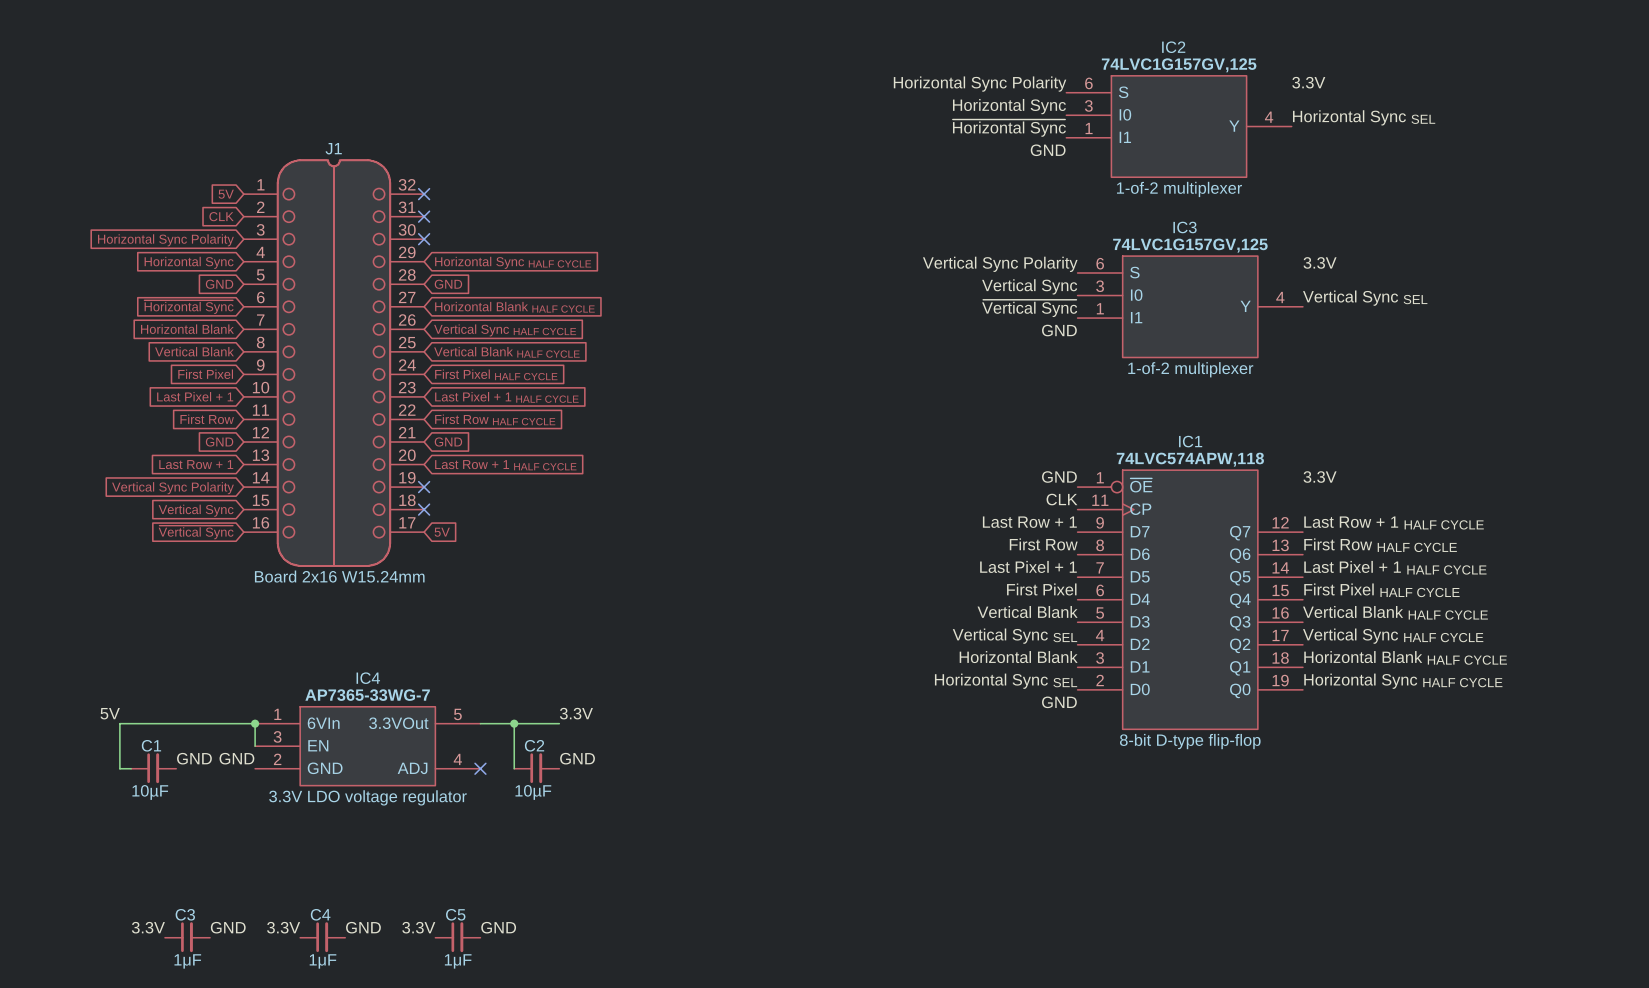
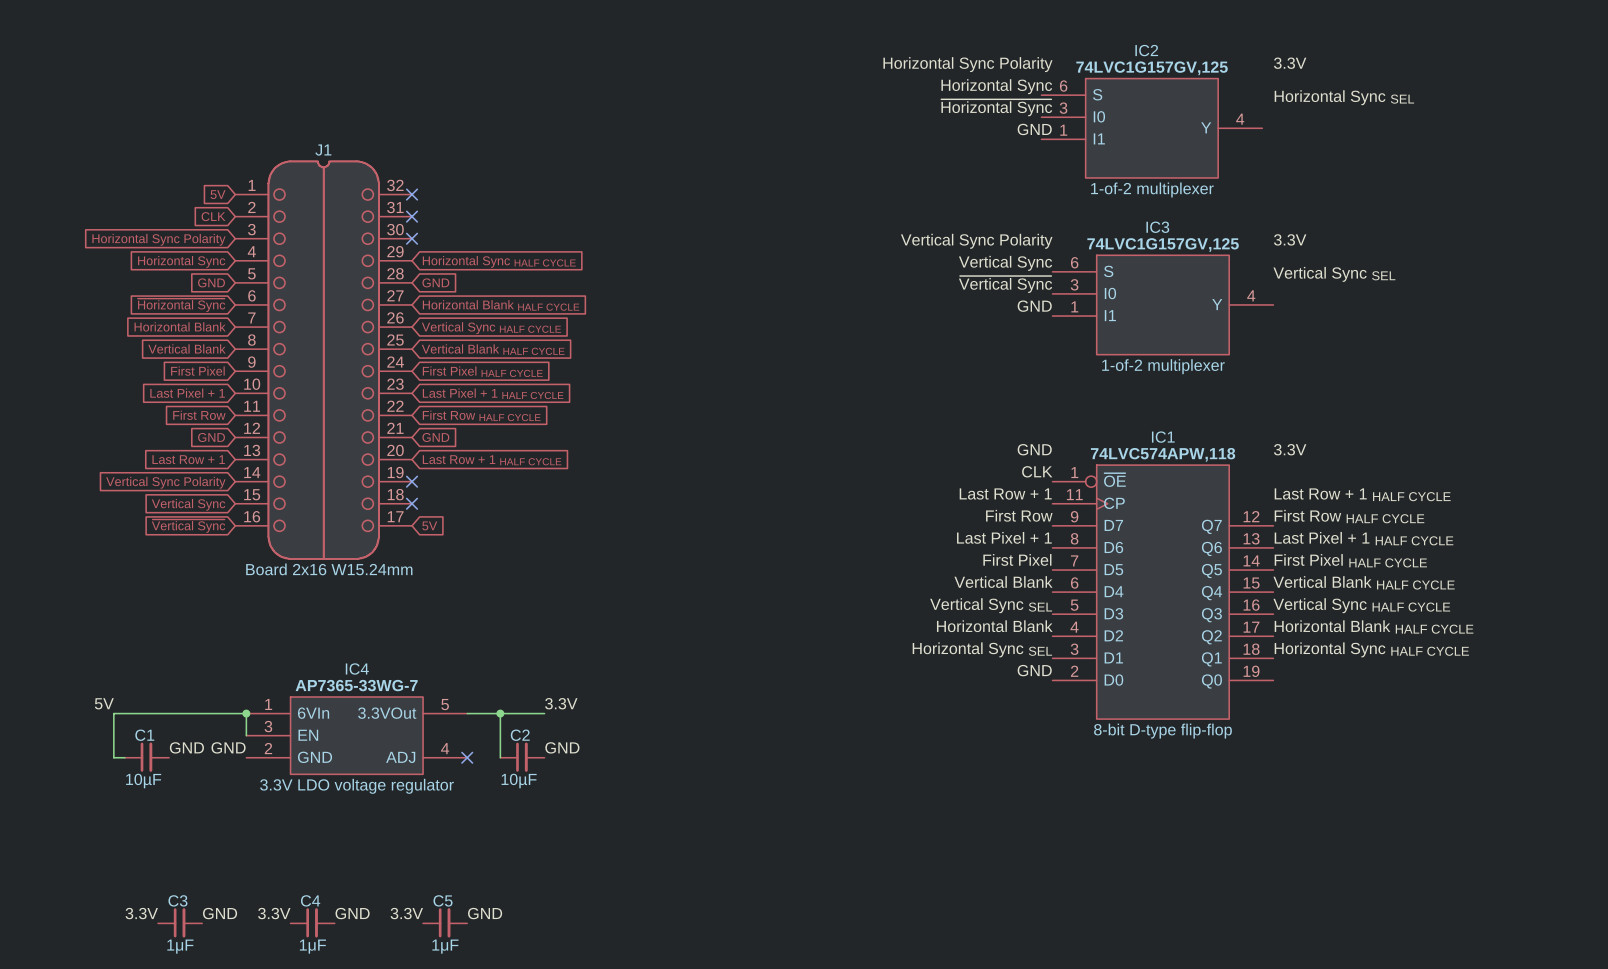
label position: 3.3V (1308, 82) -> 3.3V (1290, 63)
label position: Horizontal Sync Polarity (980, 84) -> Horizontal Sync Polarity (967, 64)
label position: Horizontal Sync (1009, 106) -> Horizontal Sync (996, 86)
label position: Horizontal Sync SEL (1364, 117) -> Horizontal Sync SEL (1344, 97)
label position: ~{Horizontal Sync} (1009, 128) -> ~{Horizontal Sync} (996, 107)
label position: GND (1048, 150) -> GND (1034, 129)
label: none -> Vertical Sync Polarity (976, 241)
label position: 3.3V (1320, 262) -> 3.3V (1290, 239)
label: Vertical Sync Polarity (1000, 264) -> Vertical Sync (1005, 263)
label: Vertical Sync (1029, 286) -> ~{Vertical Sync} (1005, 284)
label position: Vertical Sync SEL (1365, 298) -> Vertical Sync SEL (1334, 274)
label: ~{Vertical Sync} (1029, 308) -> GND (1034, 306)
label: GND (1059, 330) -> none
label: none -> GND (1034, 449)
label: GND (1059, 477) -> CLK (1037, 471)
label position: 3.3V (1320, 477) -> 3.3V (1290, 449)
label: CLK (1061, 499) -> Last Row + 1 (1005, 493)
label: none -> Last Row + 1 HALF CYCLE (1362, 494)
label: Last Row + 1 (1029, 522) -> First Row (1019, 515)
label: Last Row + 1 HALF CYCLE (1394, 522) -> First Row HALF CYCLE (1349, 516)
label: First Row (1043, 544) -> Last Pixel + 1 (1004, 537)
label: First Row HALF CYCLE (1380, 545) -> Last Pixel + 1 HALF CYCLE (1364, 538)
label: Last Pixel + 1 (1028, 566) -> First Pixel (1017, 559)
label: Last Pixel + 1 HALF CYCLE (1395, 567) -> First Pixel HALF CYCLE (1350, 560)
label: First Pixel (1041, 589) -> Vertical Blank (1003, 582)
label: First Pixel HALF CYCLE (1381, 590) -> Vertical Blank HALF CYCLE (1364, 582)
label: Vertical Blank (1027, 612) -> Vertical Sync SEL (991, 605)
label: Vertical Blank HALF CYCLE (1395, 612) -> Vertical Sync HALF CYCLE (1361, 605)
label: Vertical Sync SEL (1014, 636) -> Horizontal Blank (994, 626)
label: Vertical Sync HALF CYCLE (1393, 636) -> Horizontal Blank HALF CYCLE (1374, 627)
label: Horizontal Blank (1018, 657) -> Horizontal Sync SEL (982, 649)
label: Horizontal Blank HALF CYCLE (1405, 657) -> Horizontal Sync HALF CYCLE (1371, 649)
label: Horizontal Sync SEL (1006, 681) -> GND (1034, 670)
label: Horizontal Sync HALF CYCLE (1403, 681) -> none
label: GND (1059, 702) -> none

